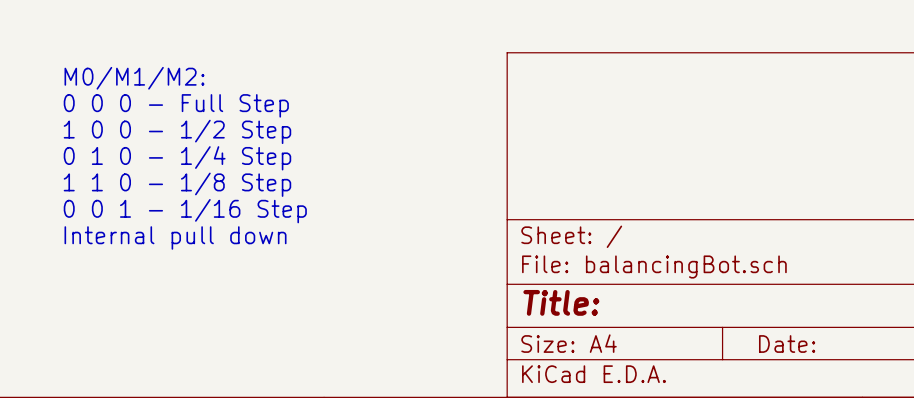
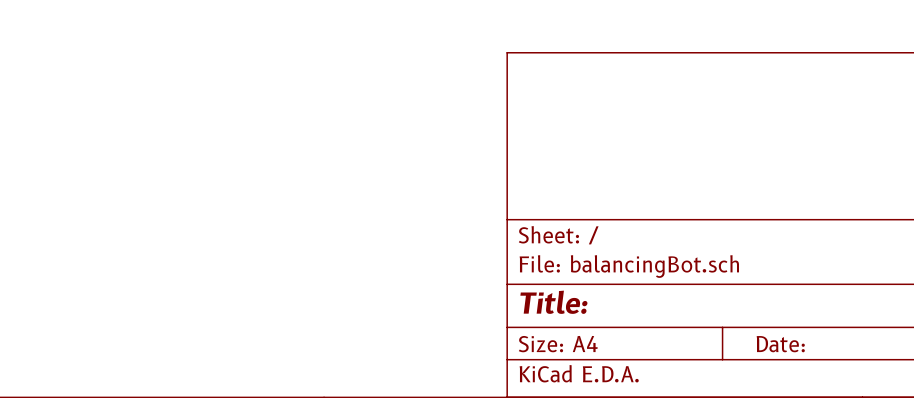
text: M0/M1/M2: (134, 78) -> none
text: 0 0 0 - Full Step (176, 105) -> none
text: 1 0 0 - 1/2 Step (177, 131) -> none
text: 0 1 0 - 1/4 Step (177, 158) -> none
text: 1 1 0 - 1/8 Step (177, 184) -> none
text: 0 0 1 - 1/16 Step (185, 211) -> none
text: Internal pull down (175, 237) -> none

